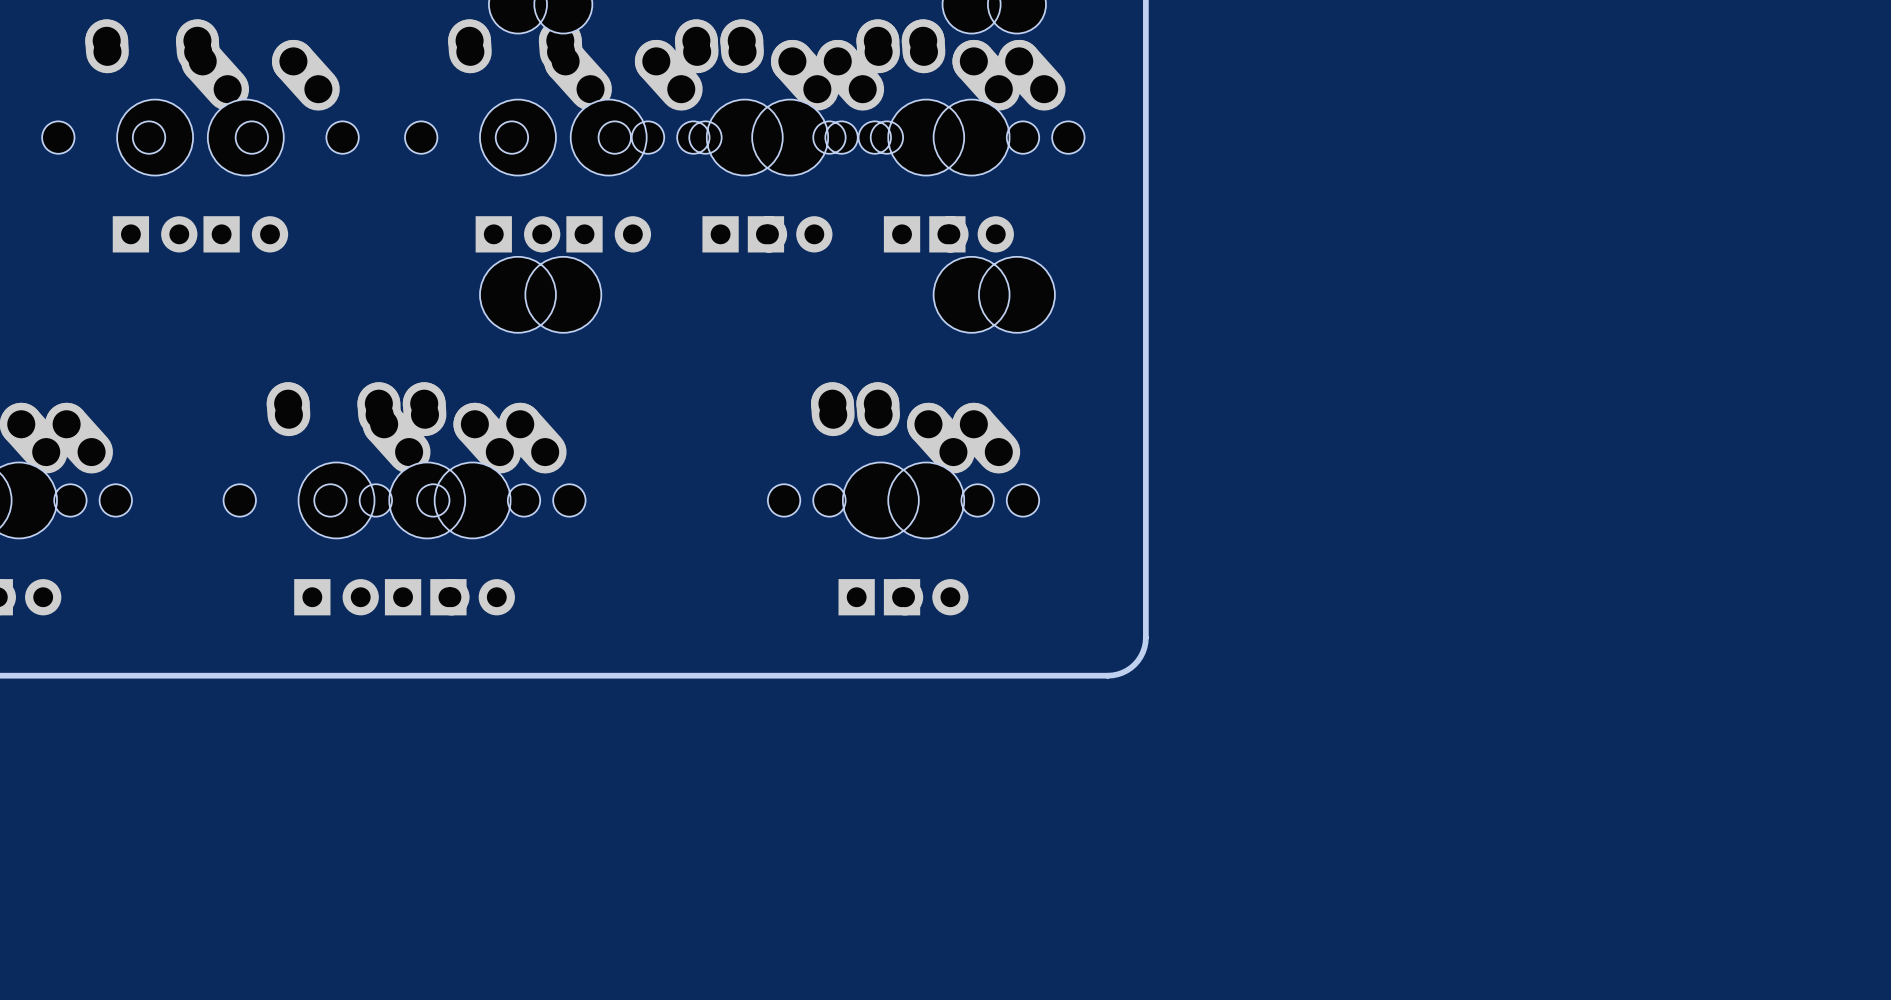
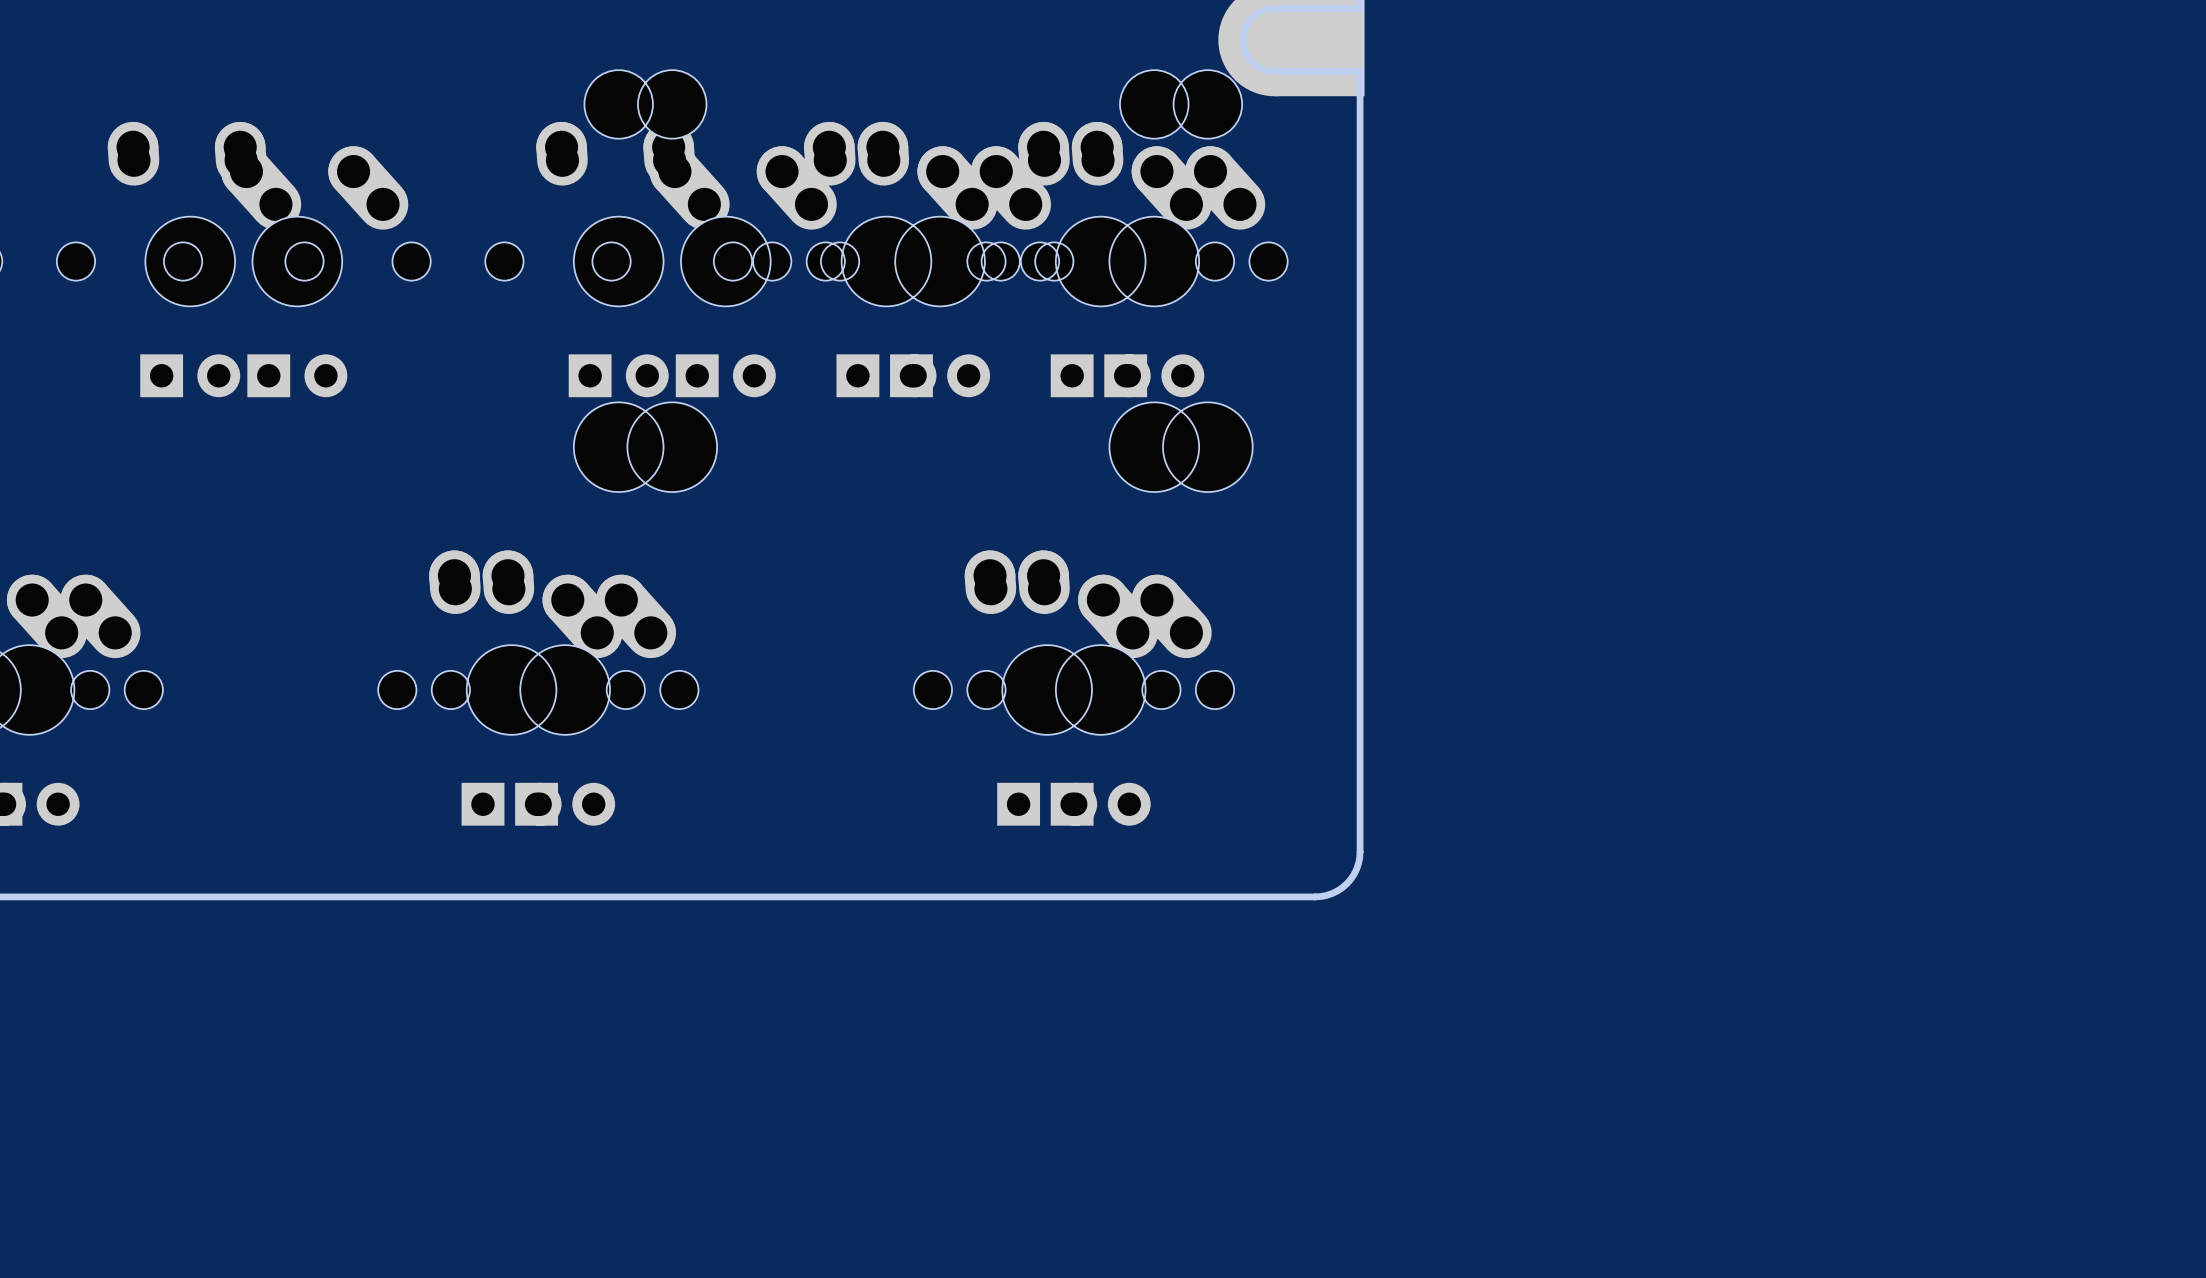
part: (336, 498) -> none

